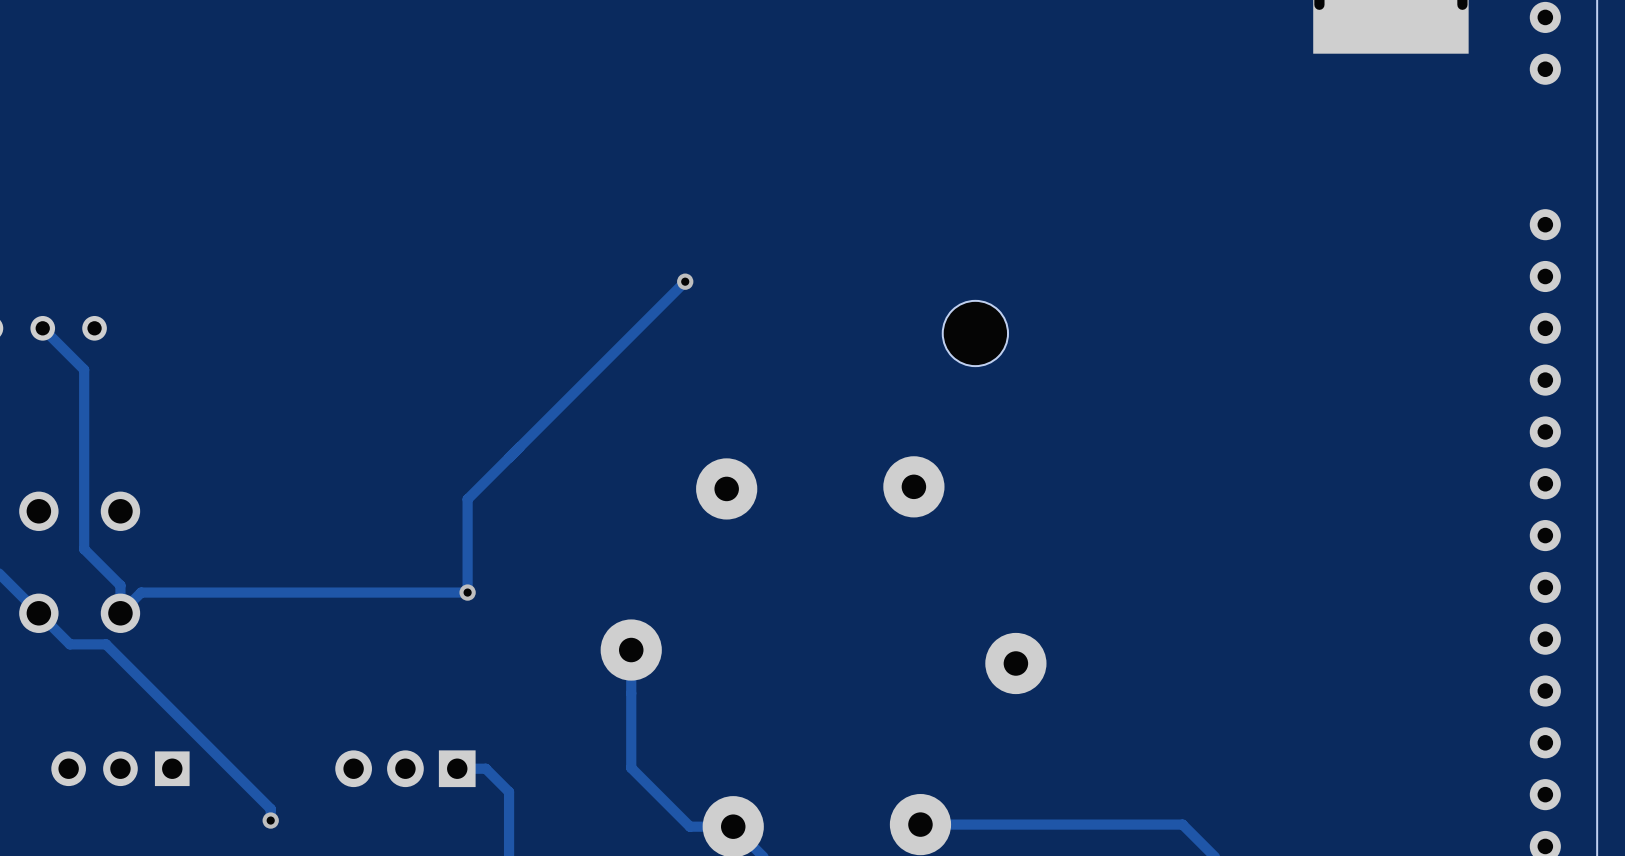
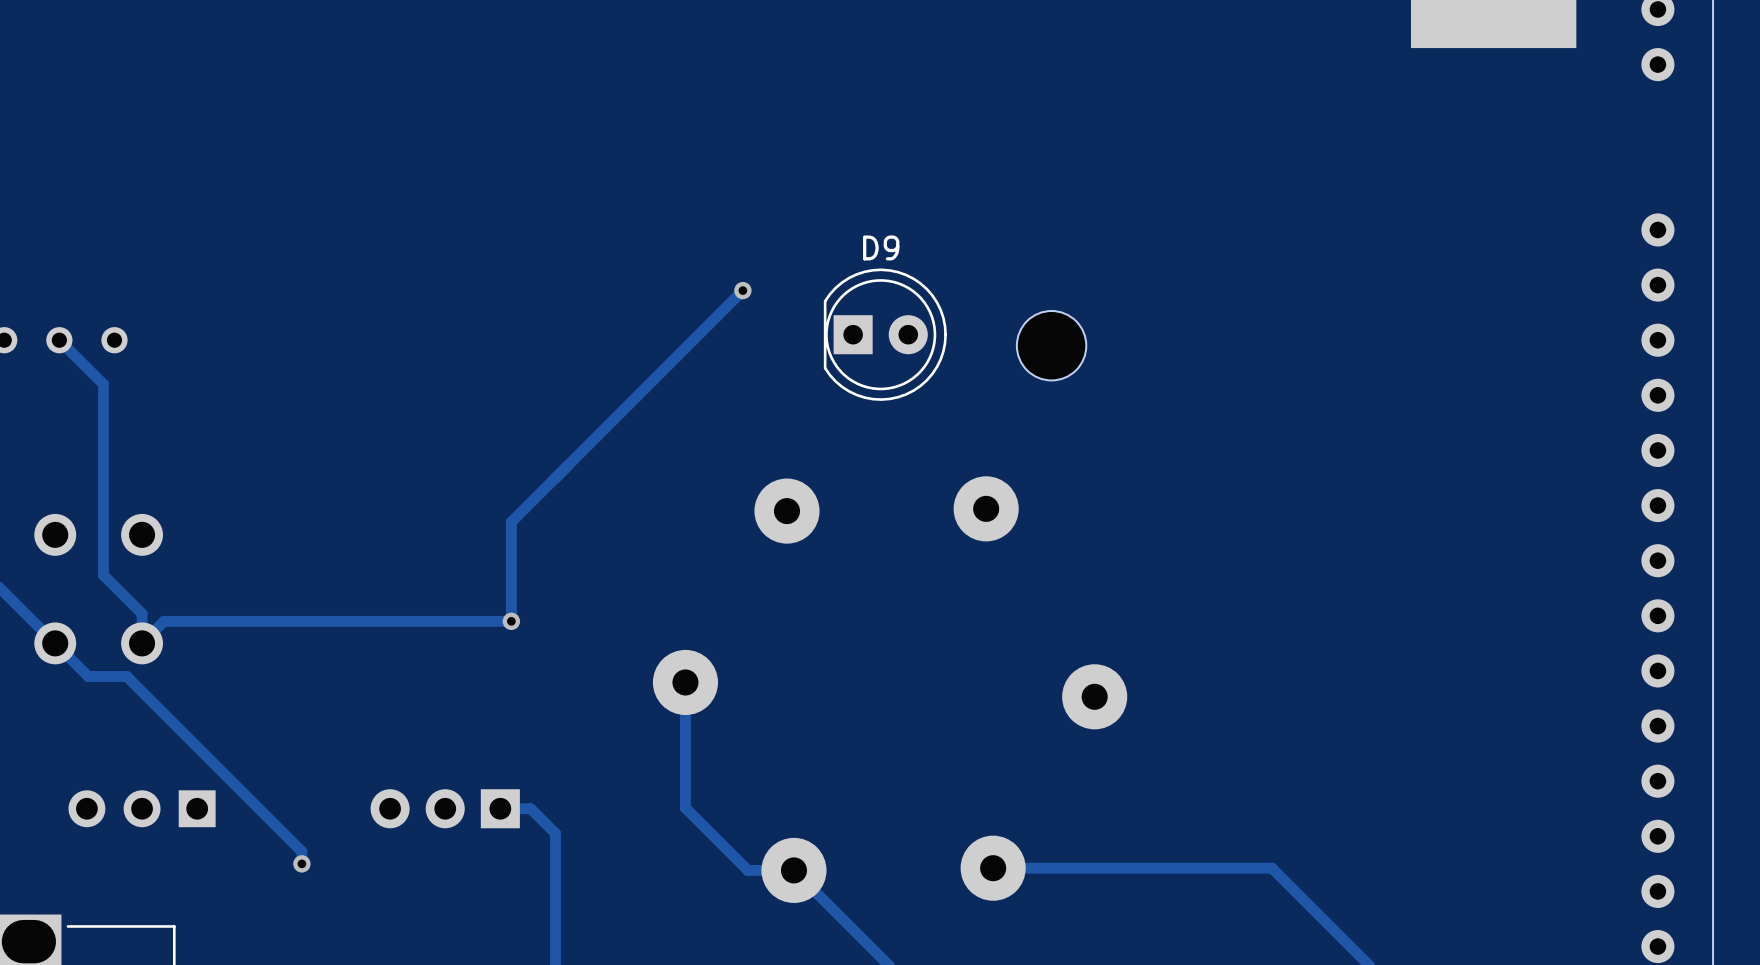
D9: none -> (885, 334)

